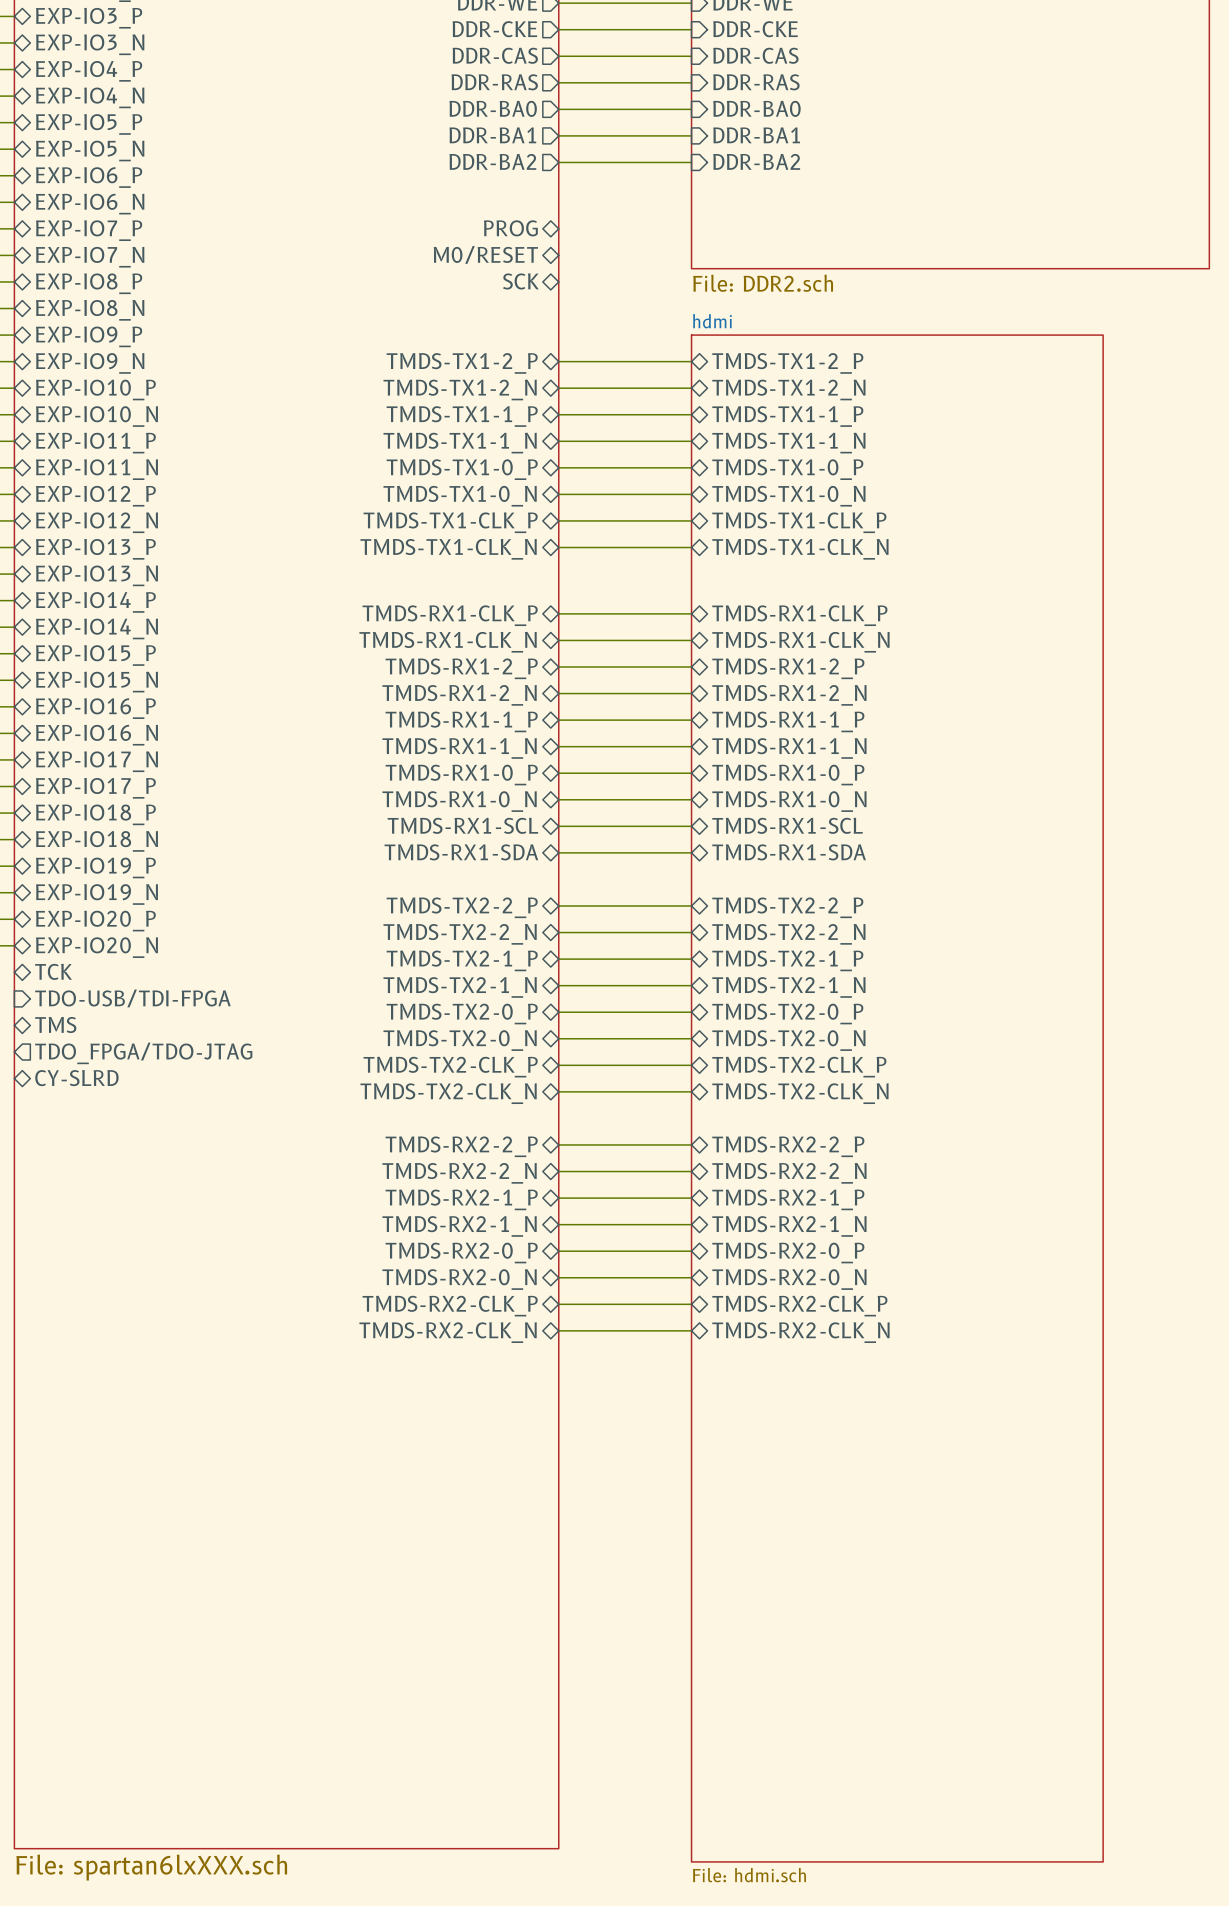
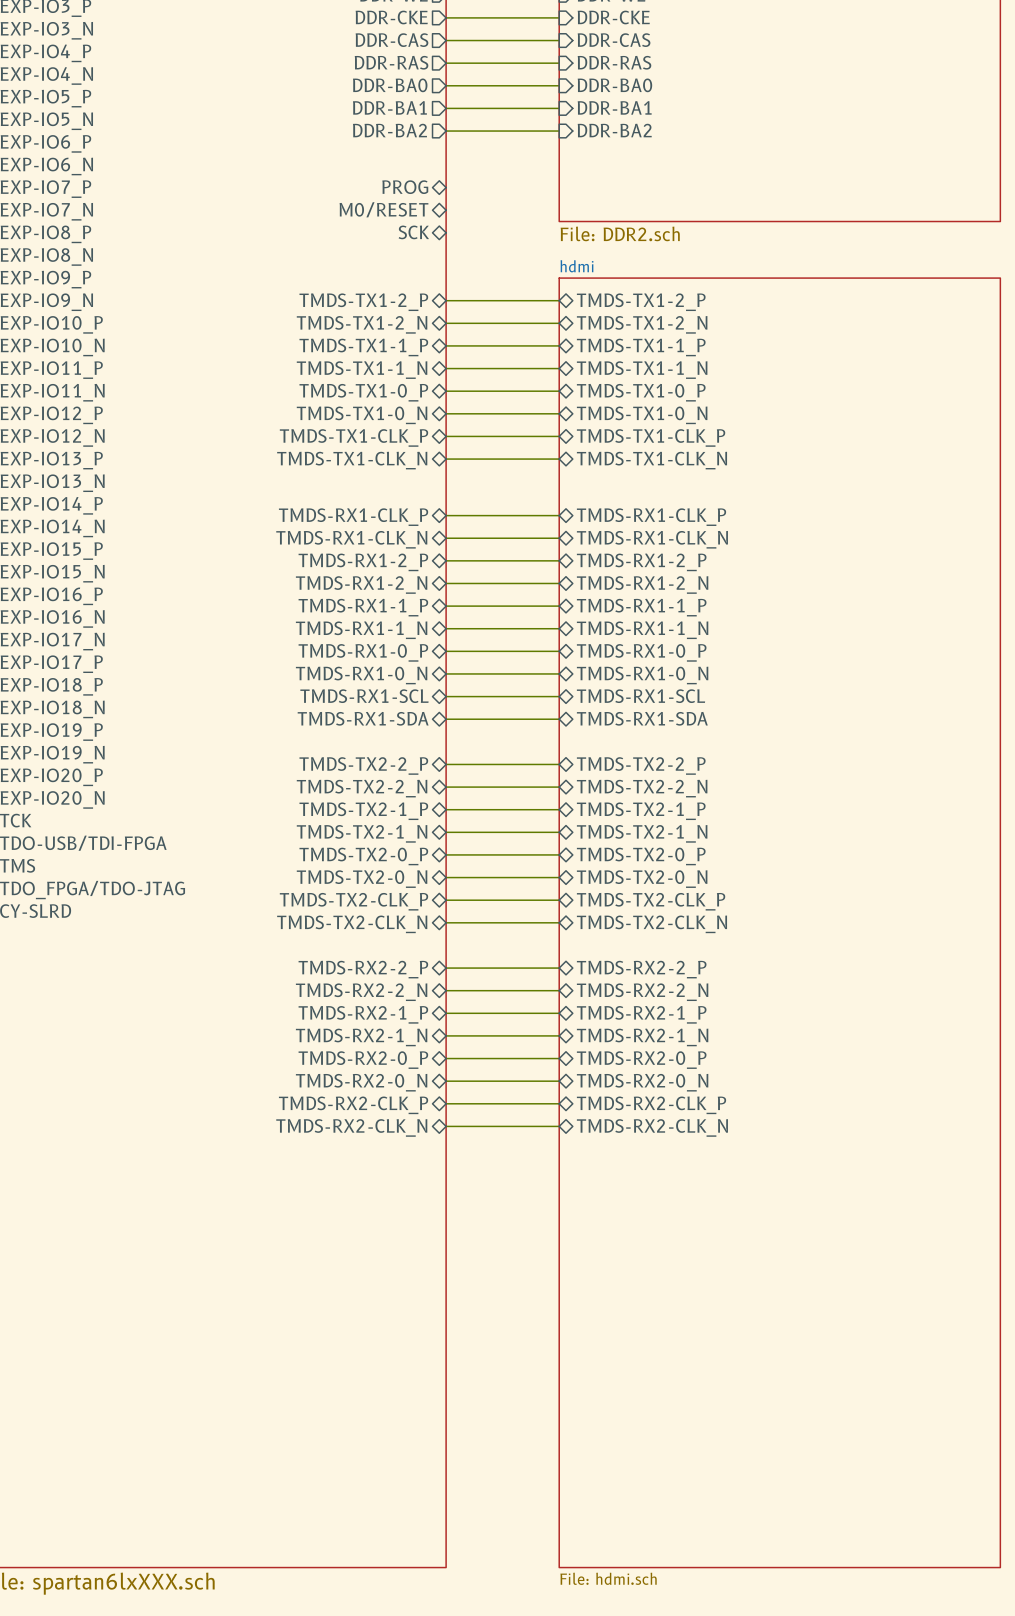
sheet hdmi: none -> File: hdmi.sch (779, 922)
sheet hdmi: File: hdmi.sch (897, 1098) -> none

